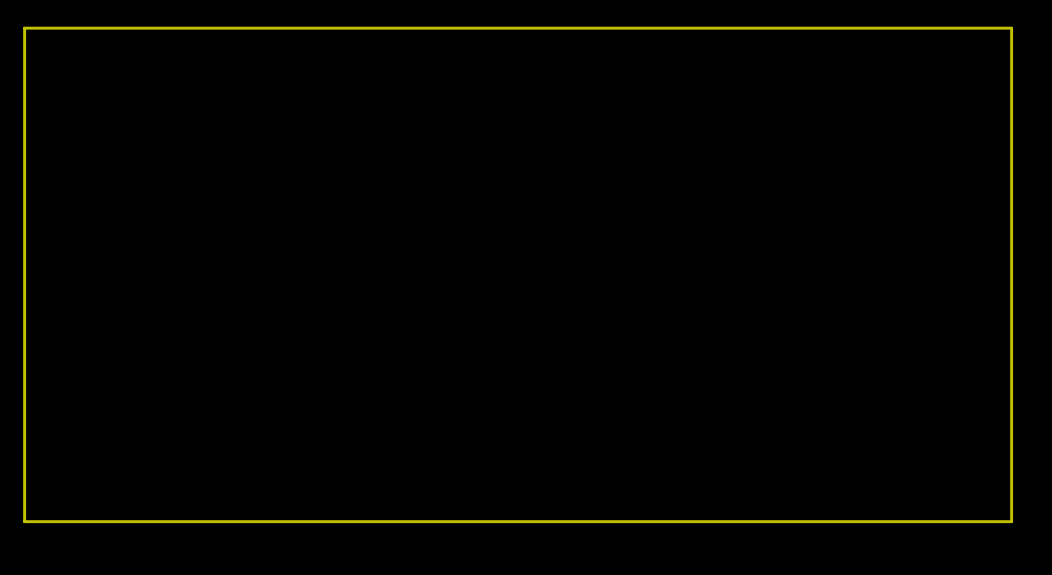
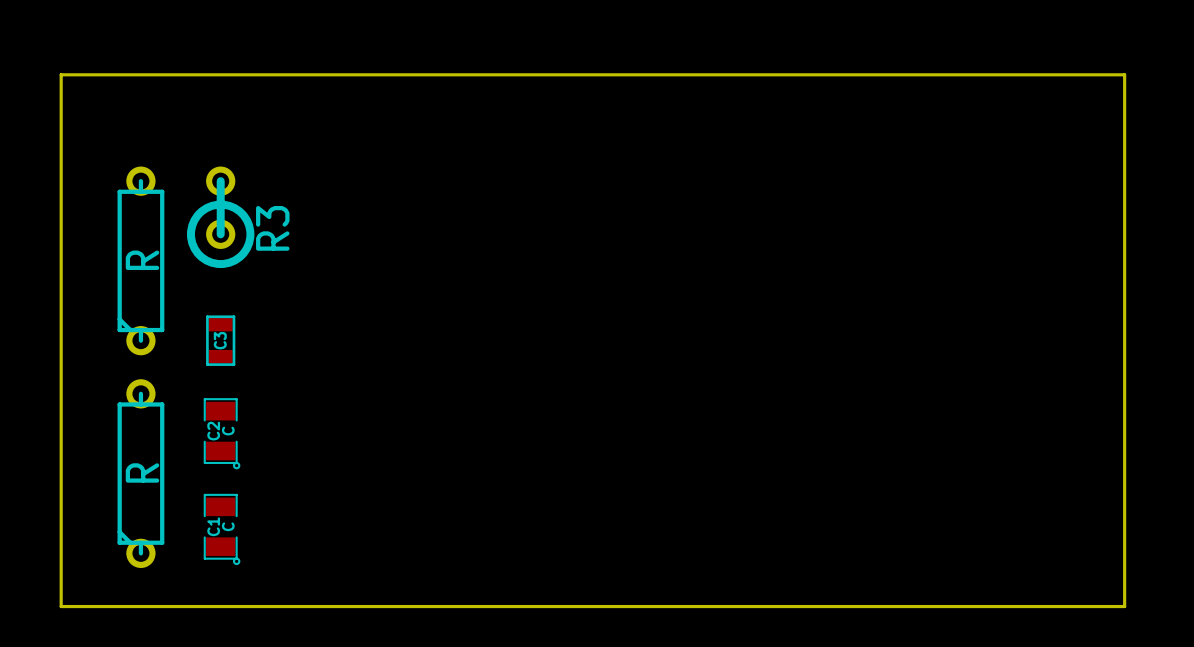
R3: none -> (220, 217)
part: none -> R (140, 260)
C3: none -> (220, 340)
C2: none -> C (222, 433)
part: none -> R (140, 473)
C1: none -> C (222, 529)

